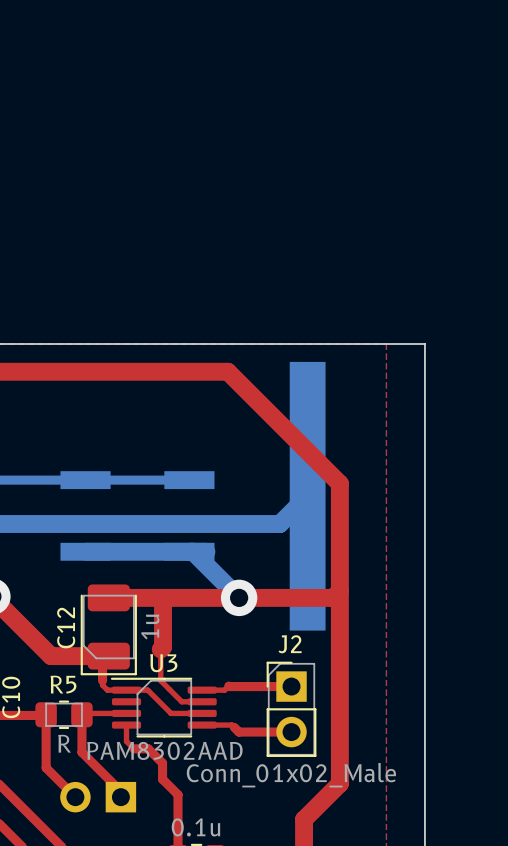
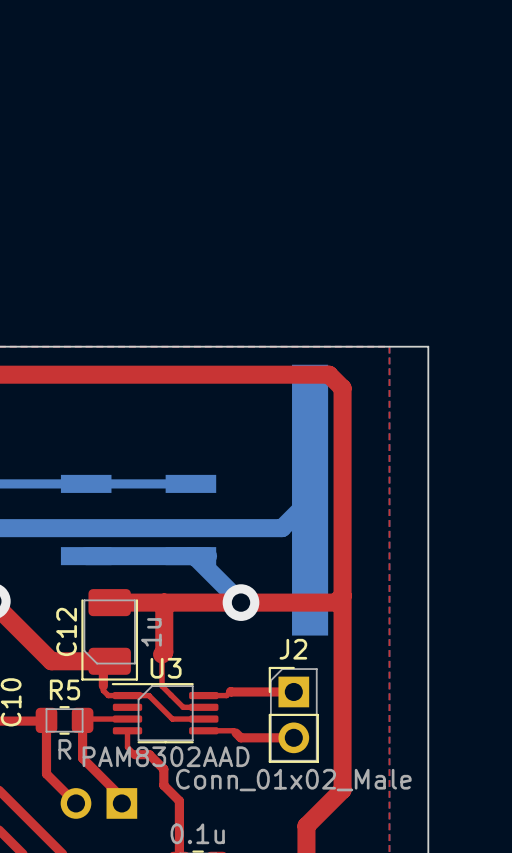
top track: (227, 371) (339, 483) -> (229, 374) (329, 374) (342, 388) (342, 487)

